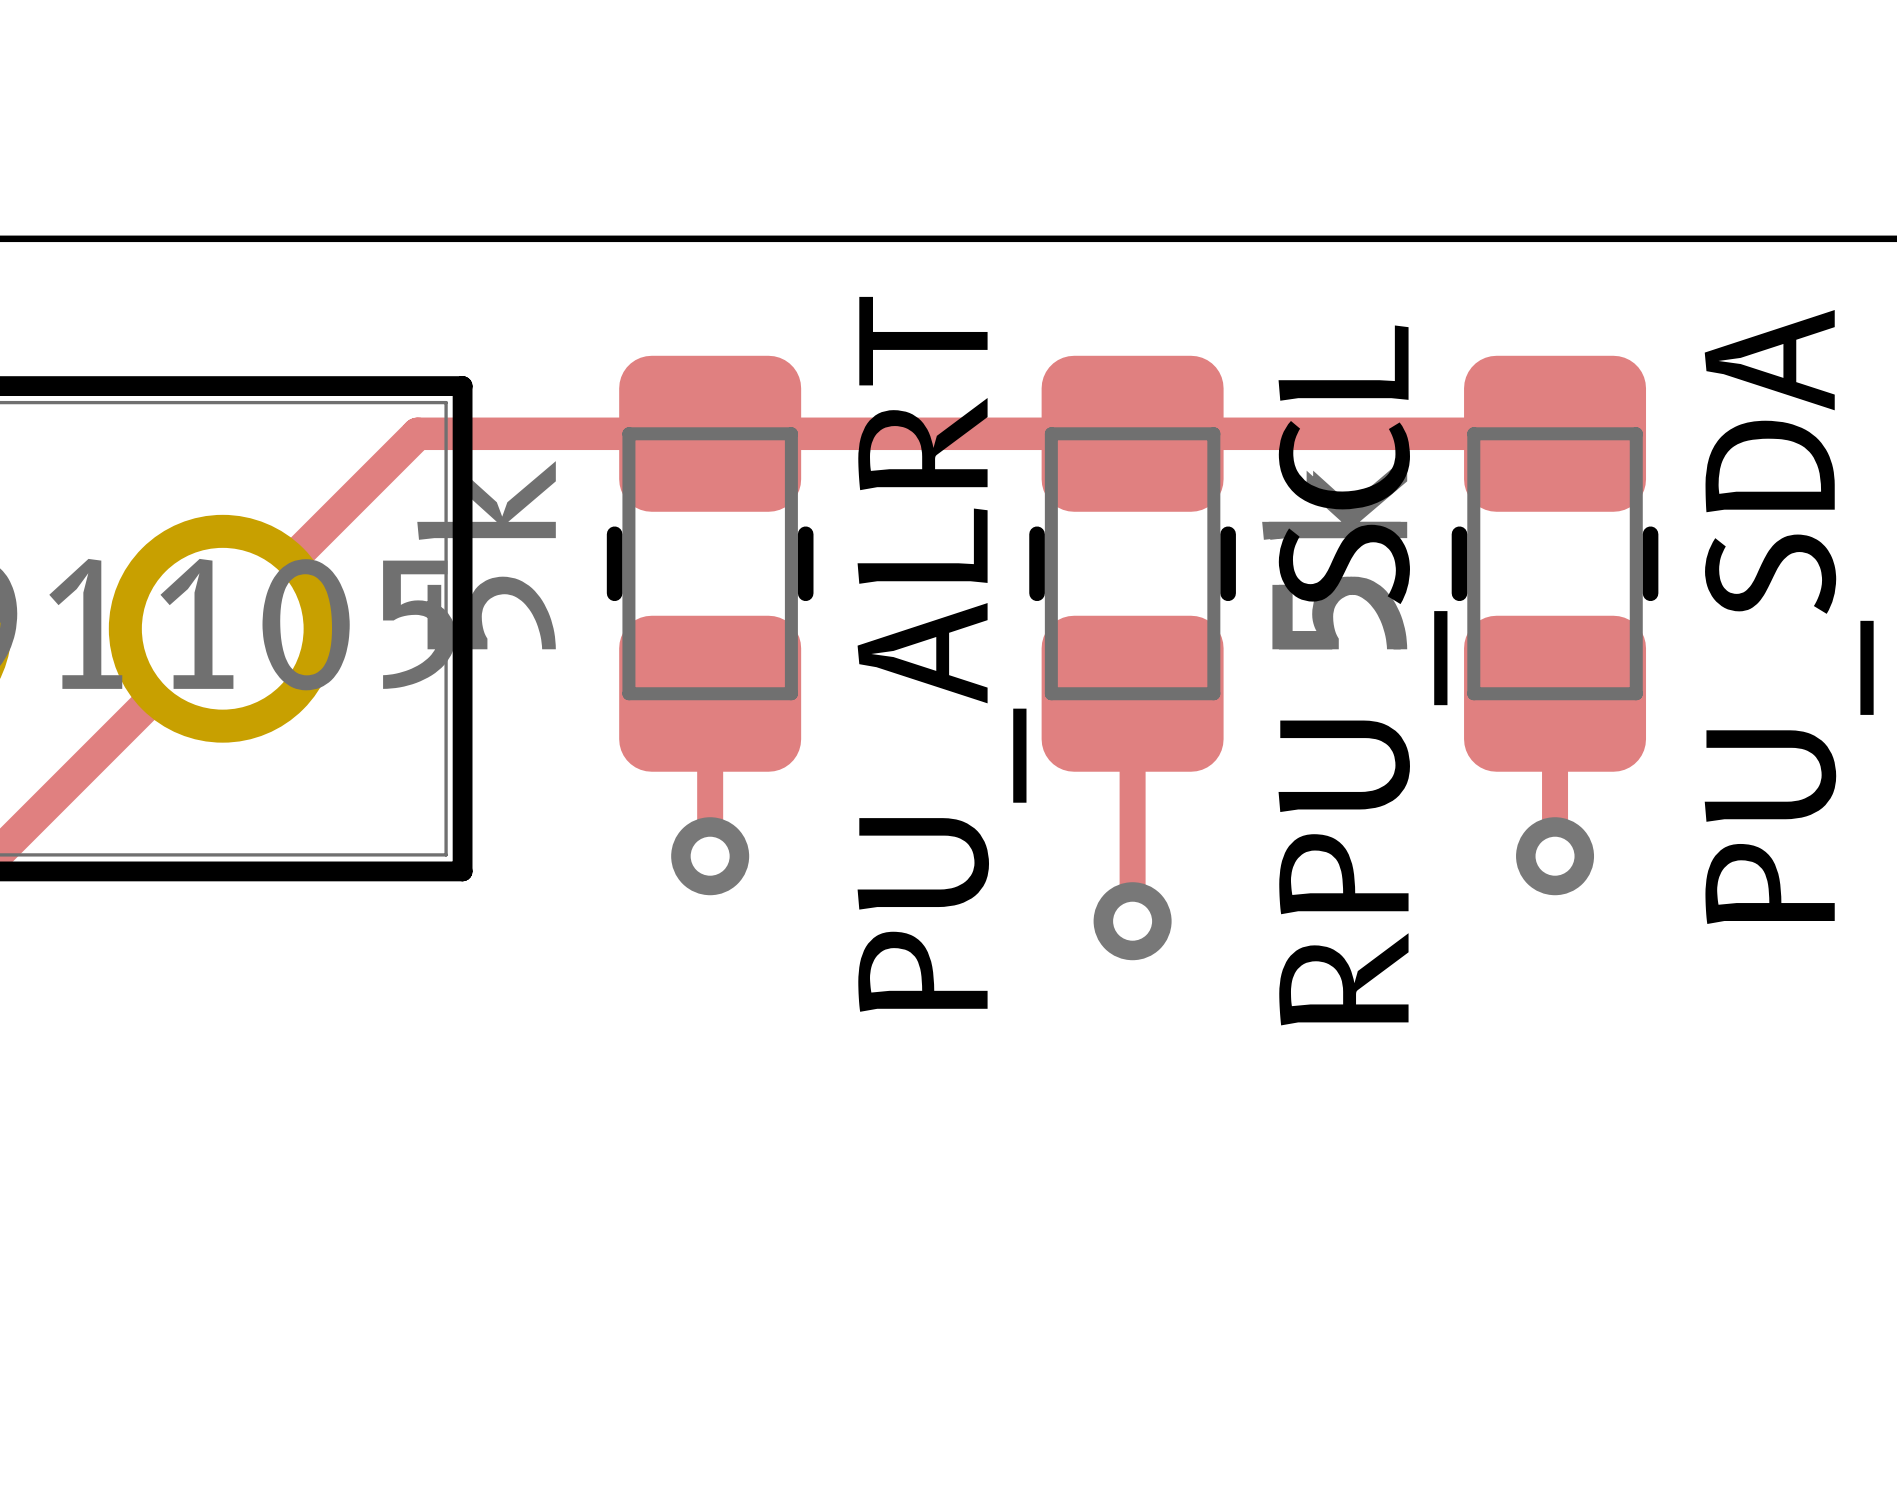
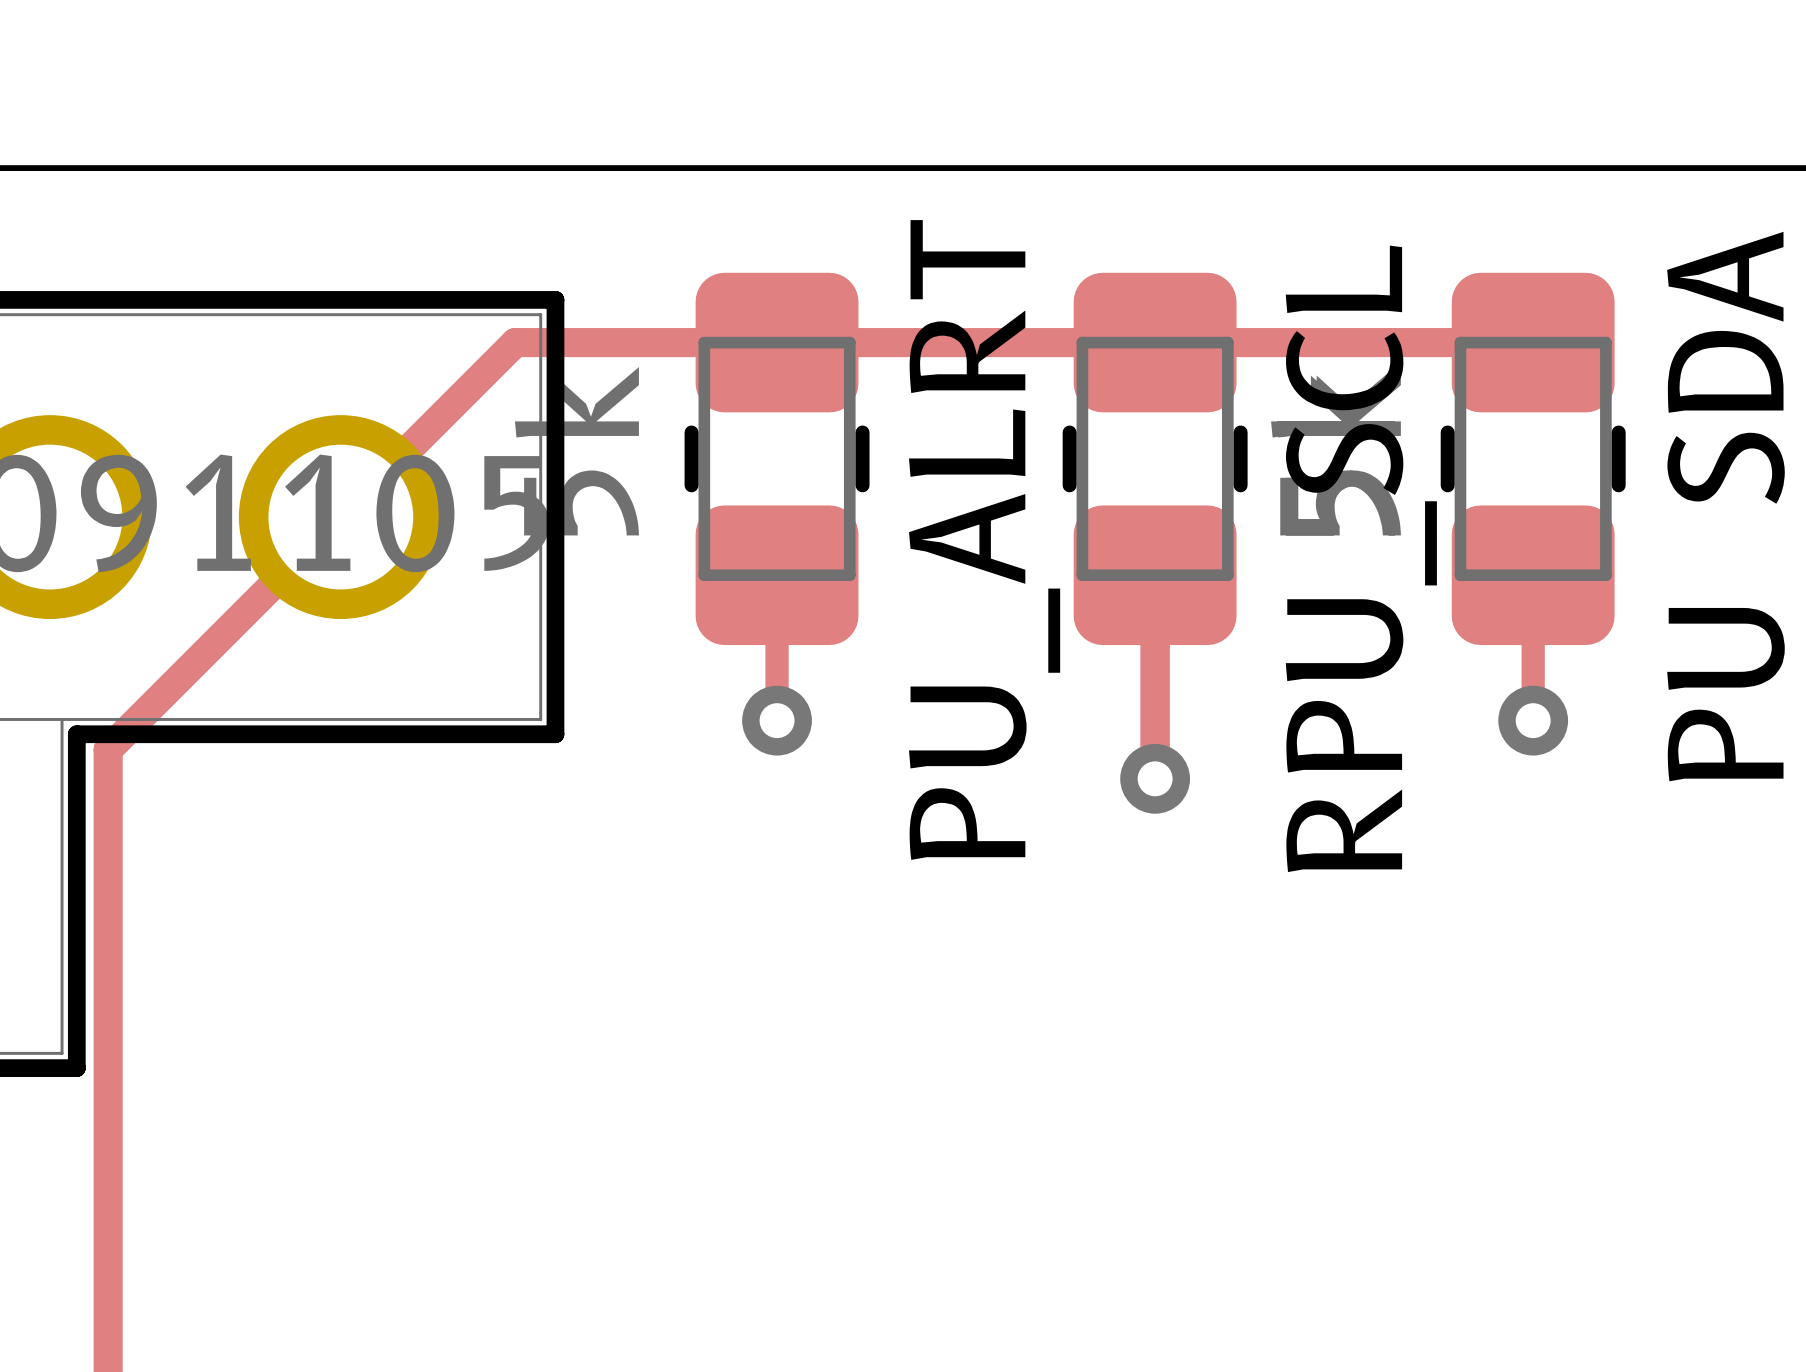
track width: thin (1132, 693) (1132, 921) -> thick (1155, 575) (1155, 778)

